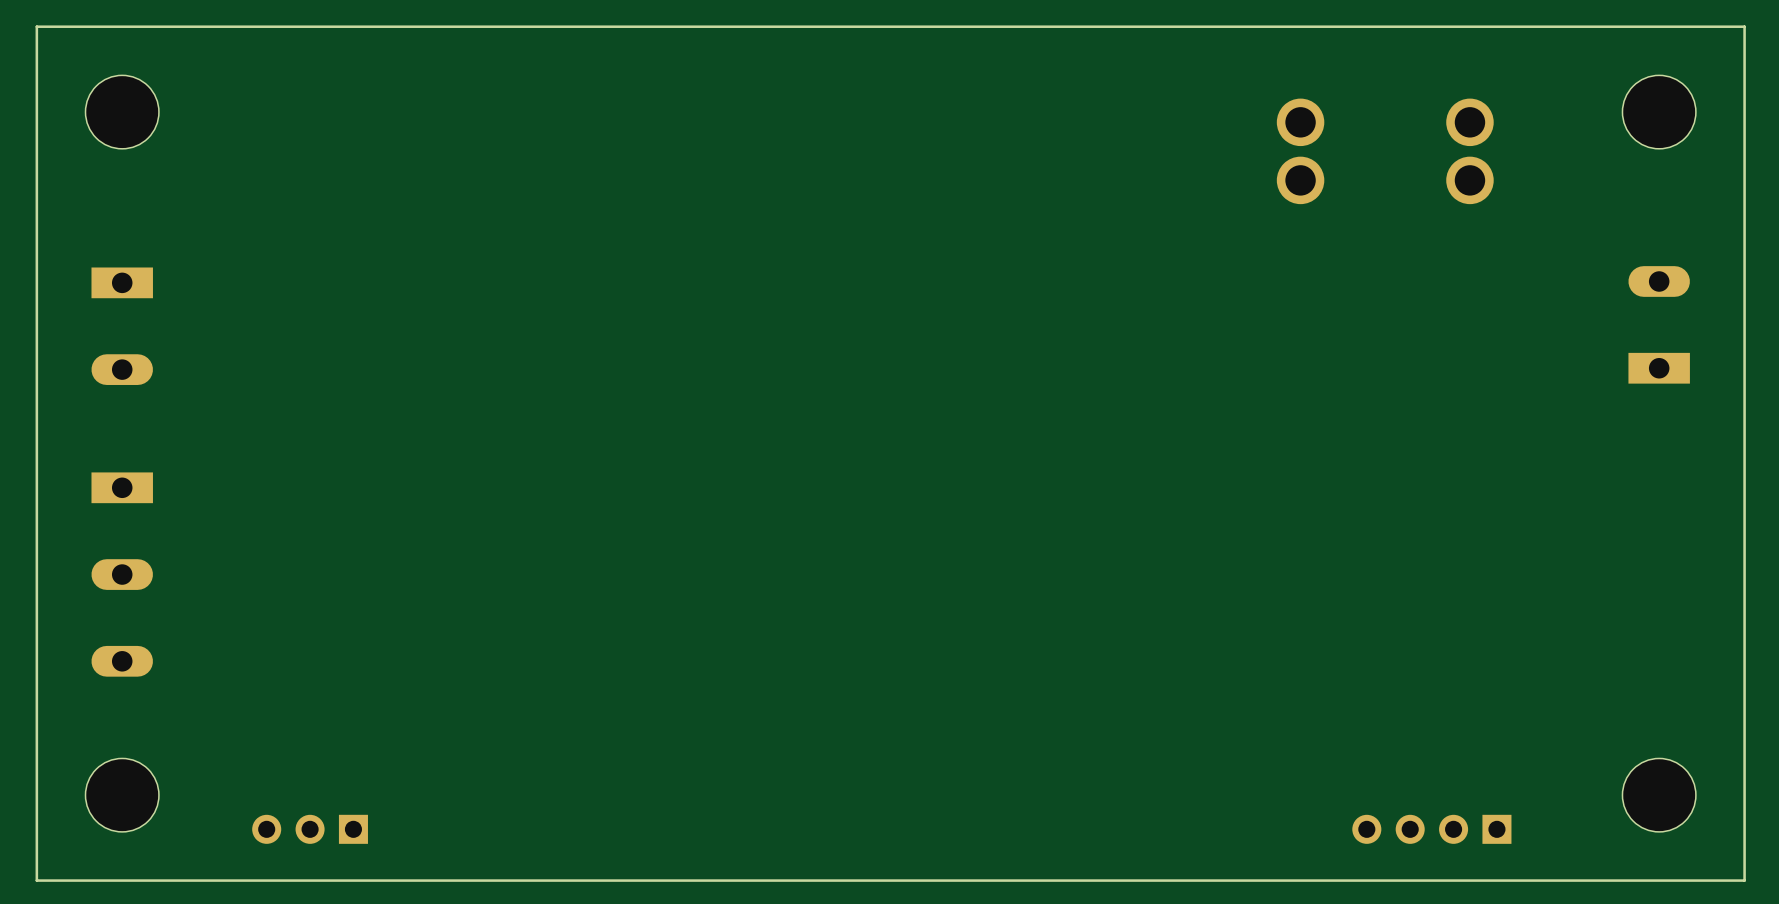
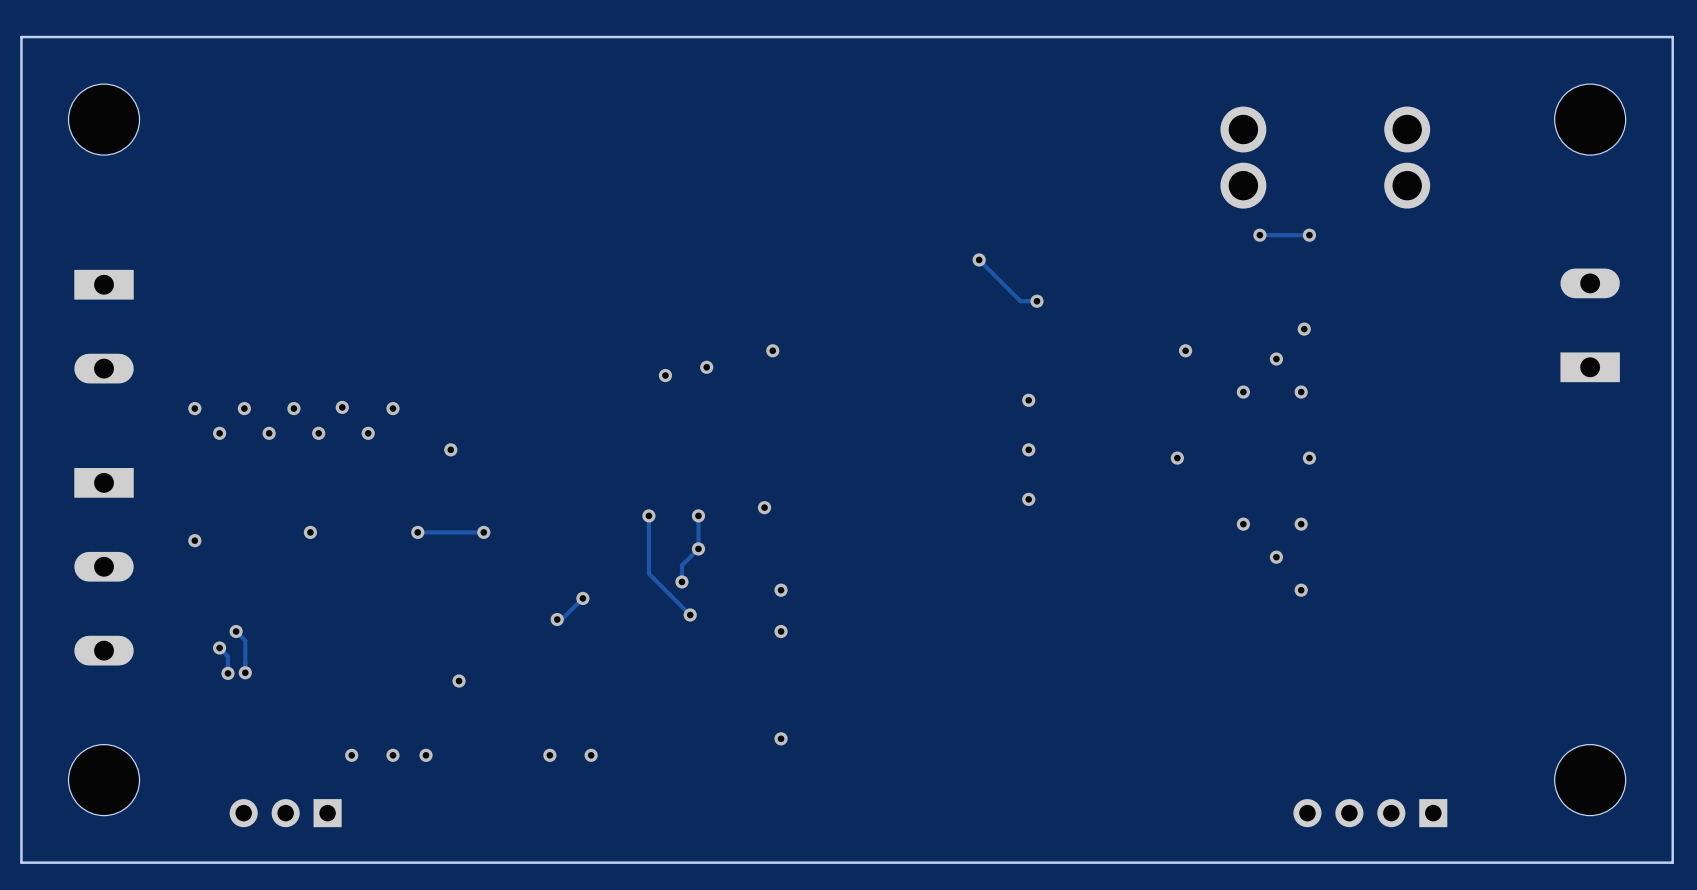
via: none -> (1259, 235)
track: none -> (1309, 235) (1259, 235)
via: none -> (1309, 235)
track: none -> (979, 259) (1020, 301) (1036, 301)
via: none -> (979, 259)
via: none -> (1036, 301)
via: none -> (1304, 329)
via: none -> (772, 350)
via: none -> (1185, 350)
via: none -> (1276, 359)
via: none -> (706, 367)
via: none -> (665, 375)
via: none -> (1243, 392)
via: none -> (1301, 392)
via: none -> (1028, 400)
via: none -> (342, 407)
via: none -> (194, 408)
via: none -> (244, 408)
via: none -> (293, 408)
via: none -> (392, 408)
via: none -> (219, 433)
via: none -> (269, 433)
via: none -> (318, 433)
via: none -> (368, 433)
via: none -> (450, 449)
via: none -> (1028, 449)
via: none -> (1177, 458)
via: none -> (1309, 458)
via: none -> (1028, 499)
via: none -> (764, 507)
track: none -> (648, 515) (648, 573) (690, 614)
via: none -> (648, 515)
track: none -> (698, 515) (698, 548) (681, 565) (681, 581)
via: none -> (698, 515)
via: none -> (1243, 524)
via: none -> (1301, 524)
via: none -> (310, 532)
via: none -> (417, 532)
track: none -> (483, 532) (417, 532)
via: none -> (483, 532)
via: none -> (194, 540)
via: none -> (698, 548)
via: none -> (1276, 557)
via: none -> (681, 581)
via: none -> (781, 590)
via: none -> (1301, 590)
track: none -> (582, 598) (561, 619) (557, 619)
via: none -> (582, 598)
via: none -> (690, 614)
via: none -> (557, 619)
track: none -> (236, 631) (245, 640) (245, 672)
via: none -> (236, 631)
via: none -> (781, 631)
track: none -> (219, 648) (227, 656) (227, 673)
via: none -> (219, 648)
via: none -> (227, 673)
via: none -> (245, 672)
via: none -> (459, 681)
via: none -> (781, 738)
via: none -> (351, 755)
via: none -> (392, 755)
via: none -> (426, 755)
via: none -> (549, 755)
via: none -> (591, 755)

